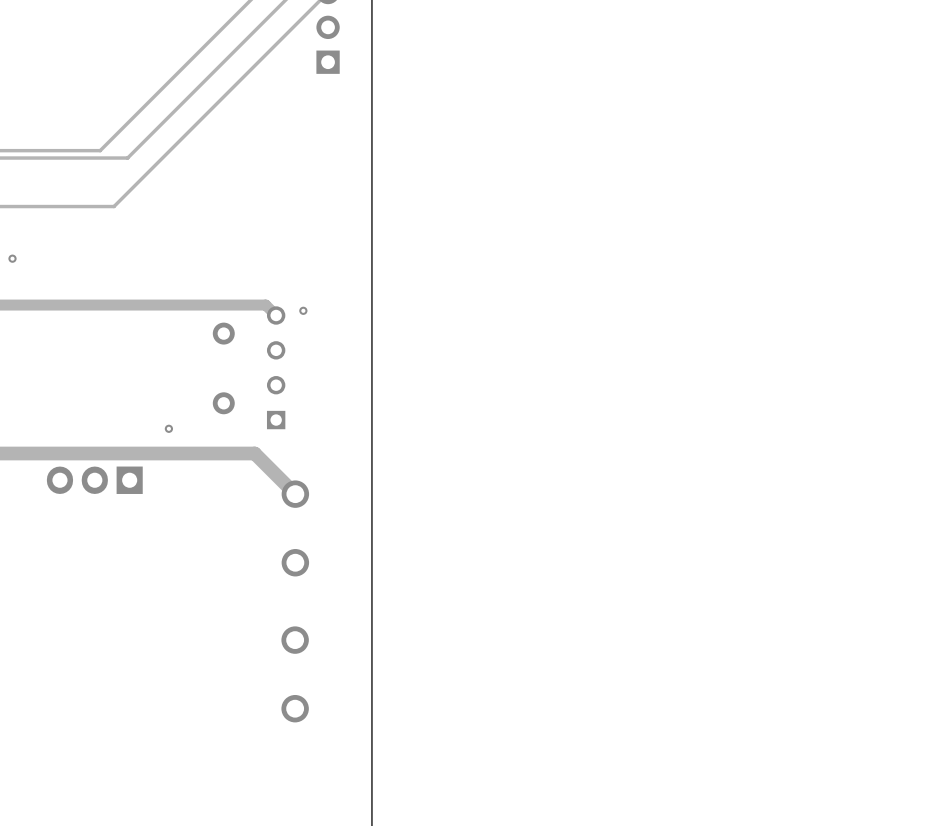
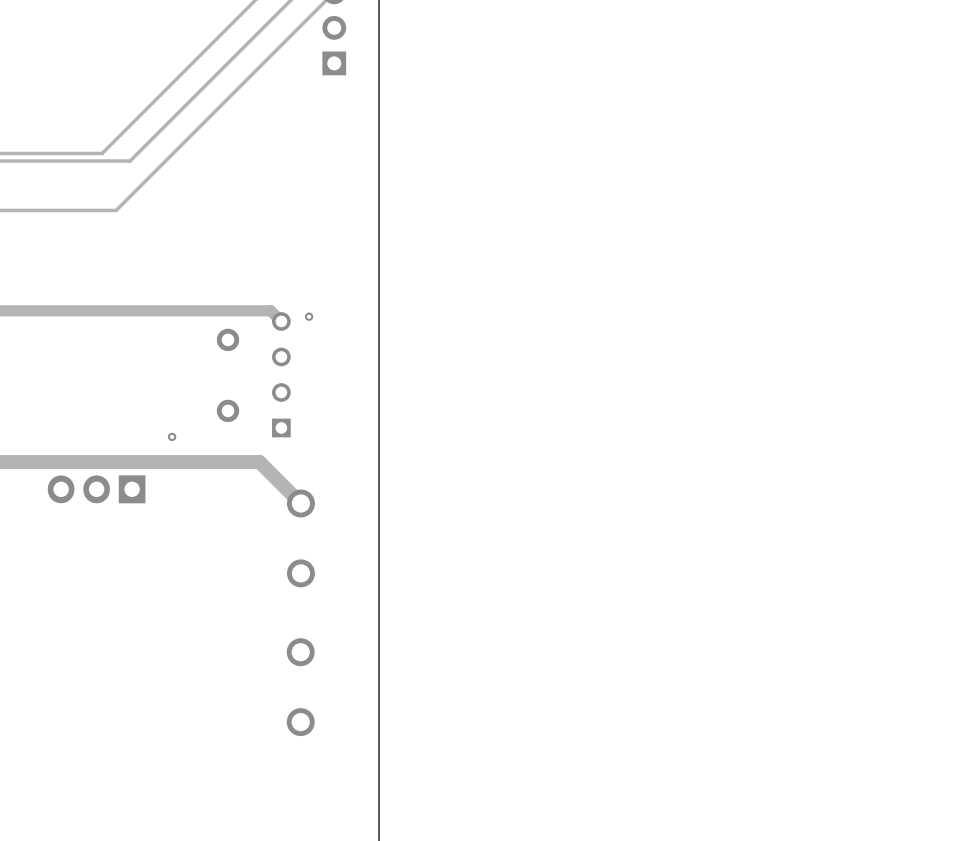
via: (12, 258) -> none

